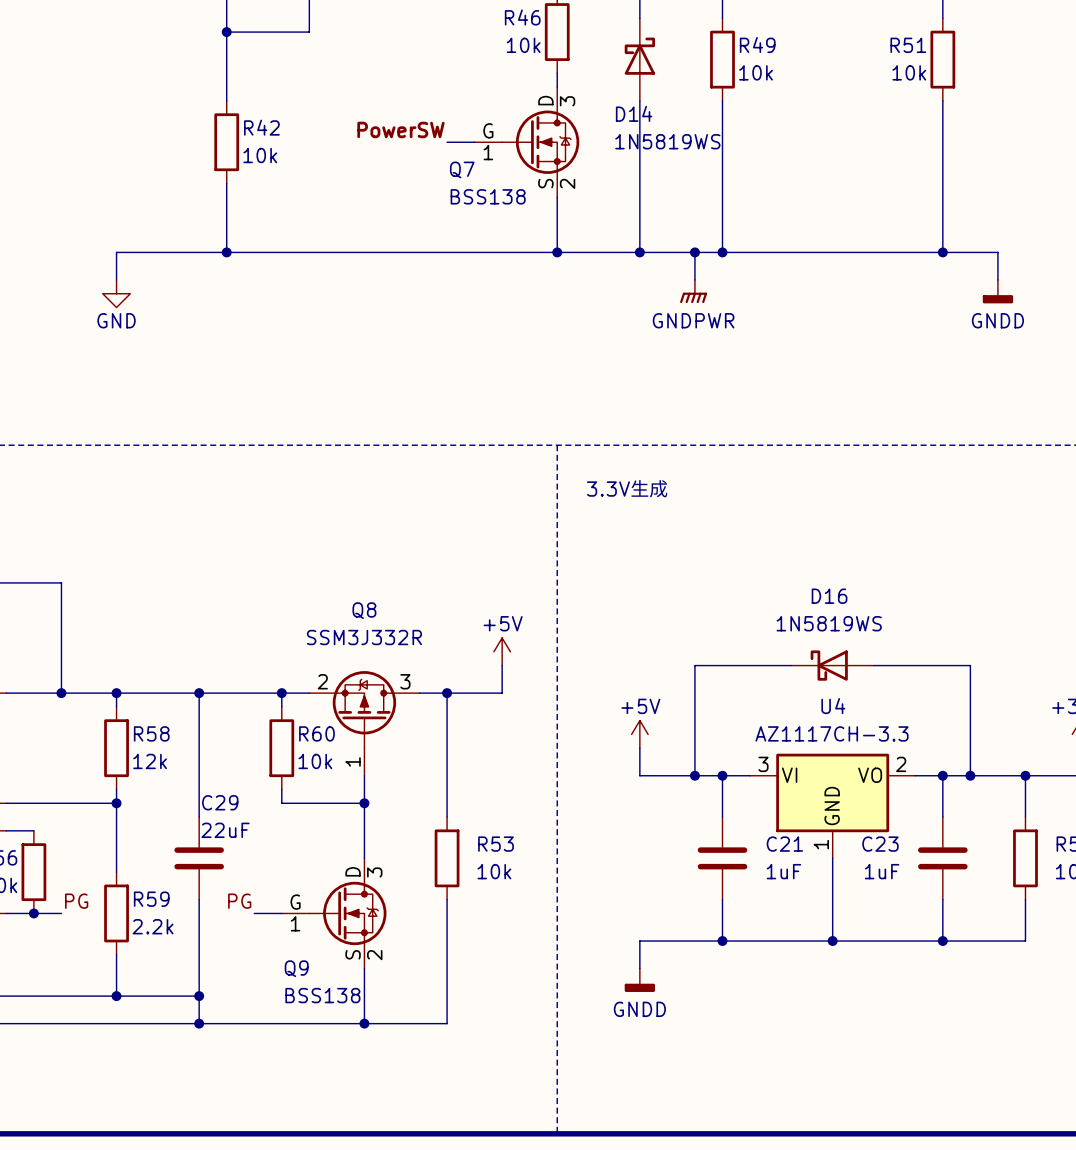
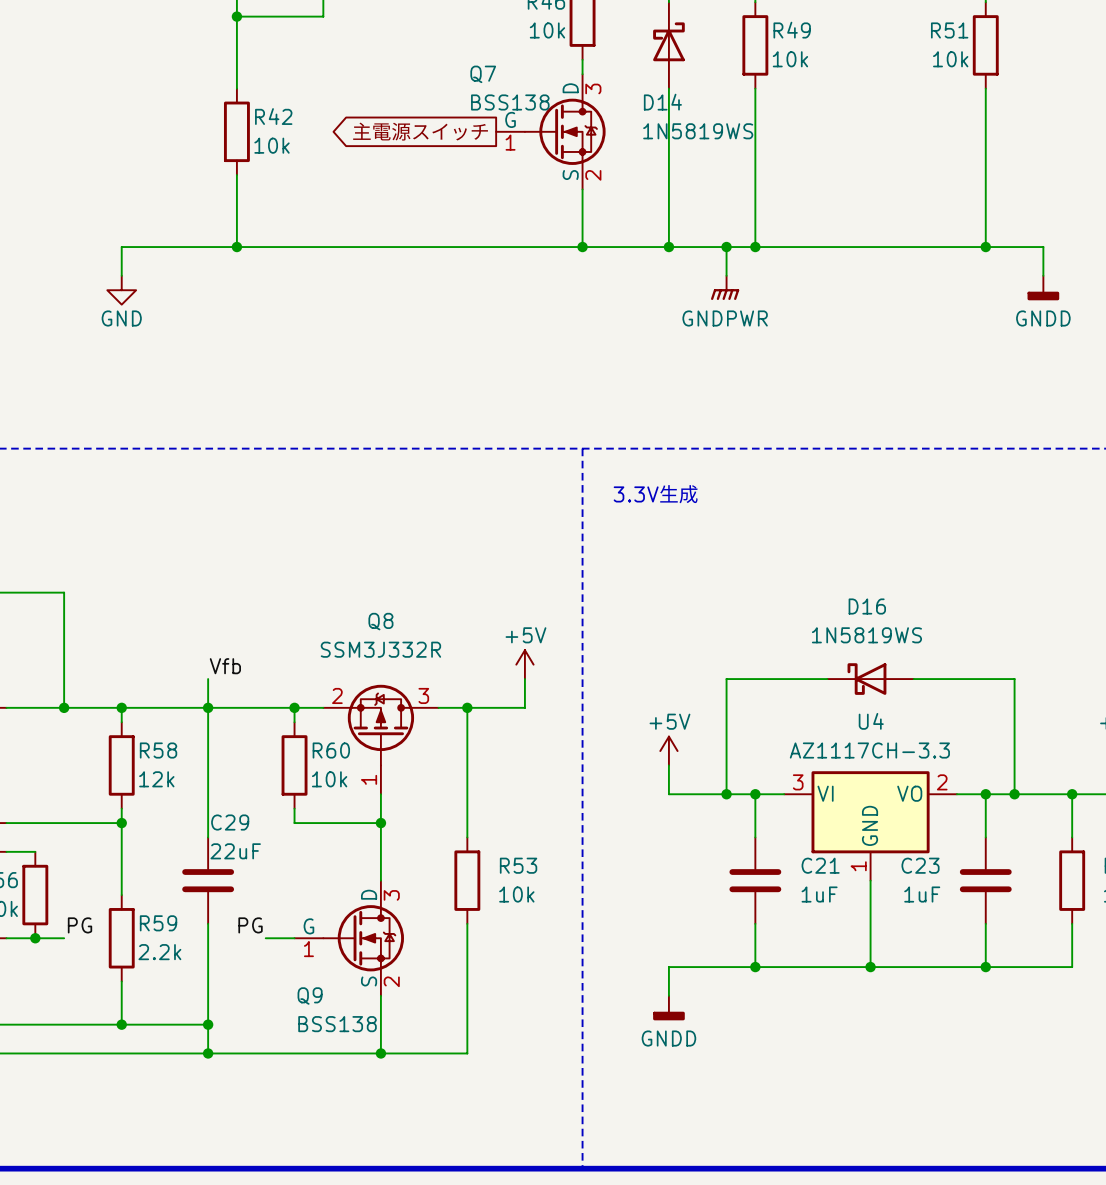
label: PowerSW (400, 129) -> none
global label: none -> 主電源スイッチ (420, 131)
wire: (447, 142) (474, 142) -> none
Q7 name position: Q7 (462, 169) -> Q7 (483, 74)
Q7 value position: BSS138 (488, 196) -> BSS138 (510, 102)
label: none -> Vfb (225, 666)
wire: none -> (208, 679) (208, 707)

